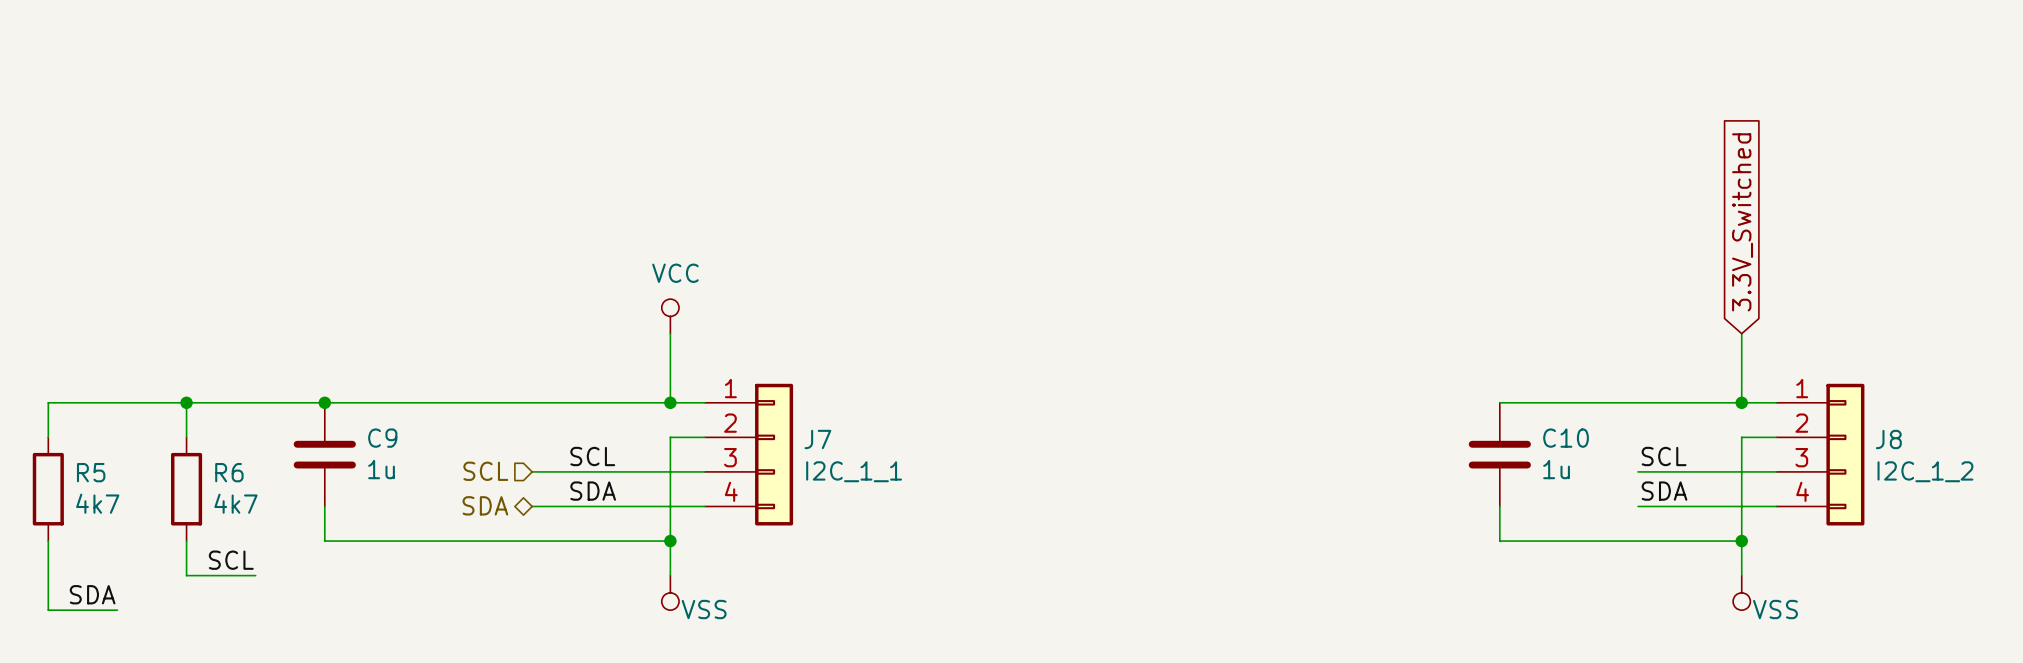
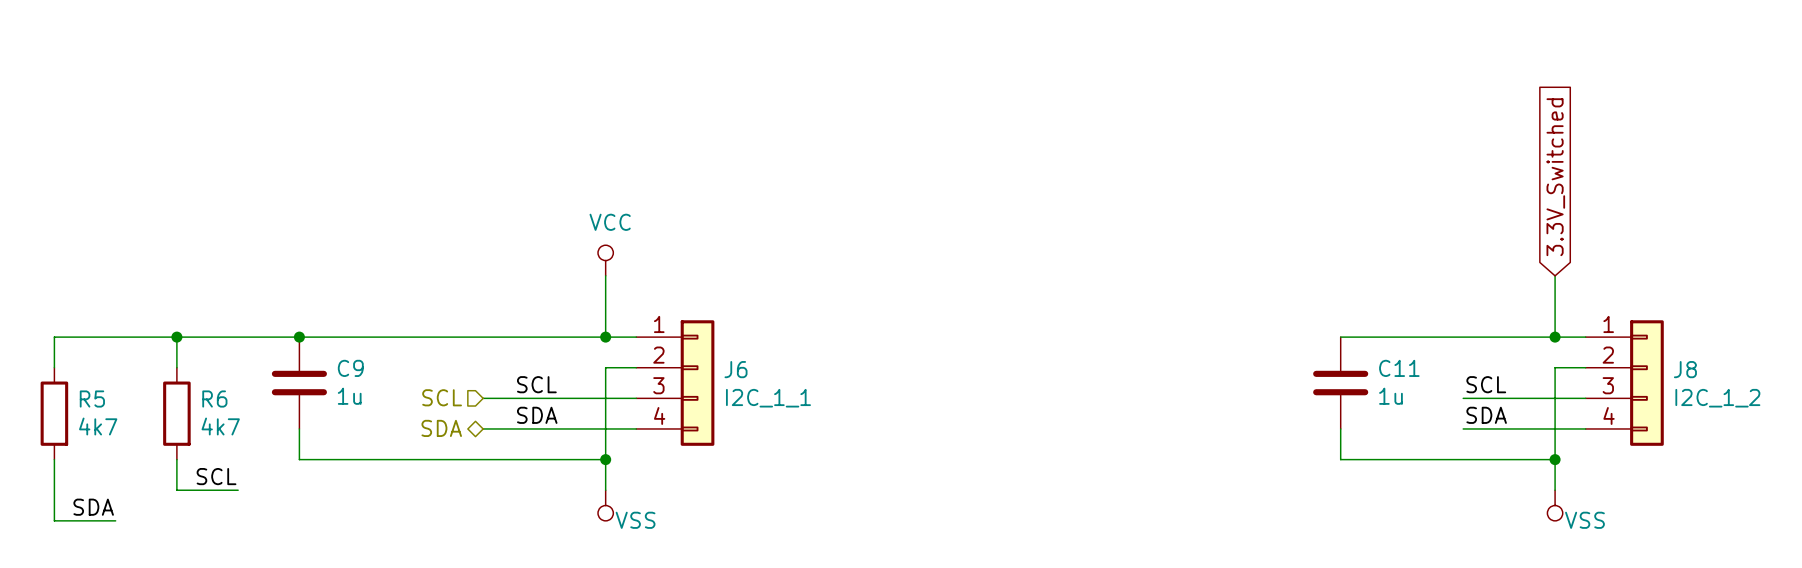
C10 name: C10 (1566, 438) -> C11 (1399, 368)
J7 name: J7 (817, 439) -> J6 (736, 369)

